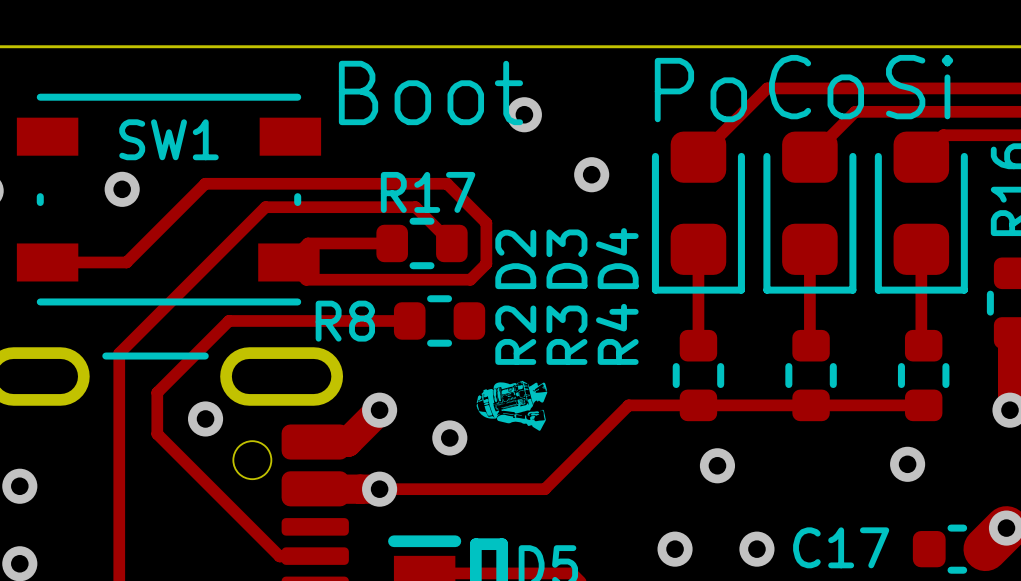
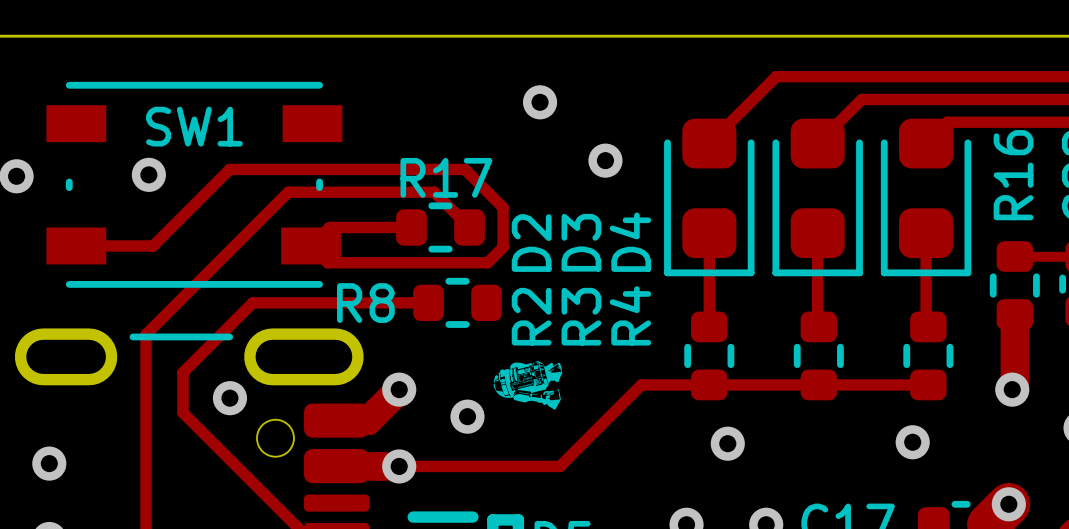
text: Co (816, 87) -> none
text: Si (919, 87) -> none
text: Po (700, 90) -> none
text: Boot (430, 92) -> none

